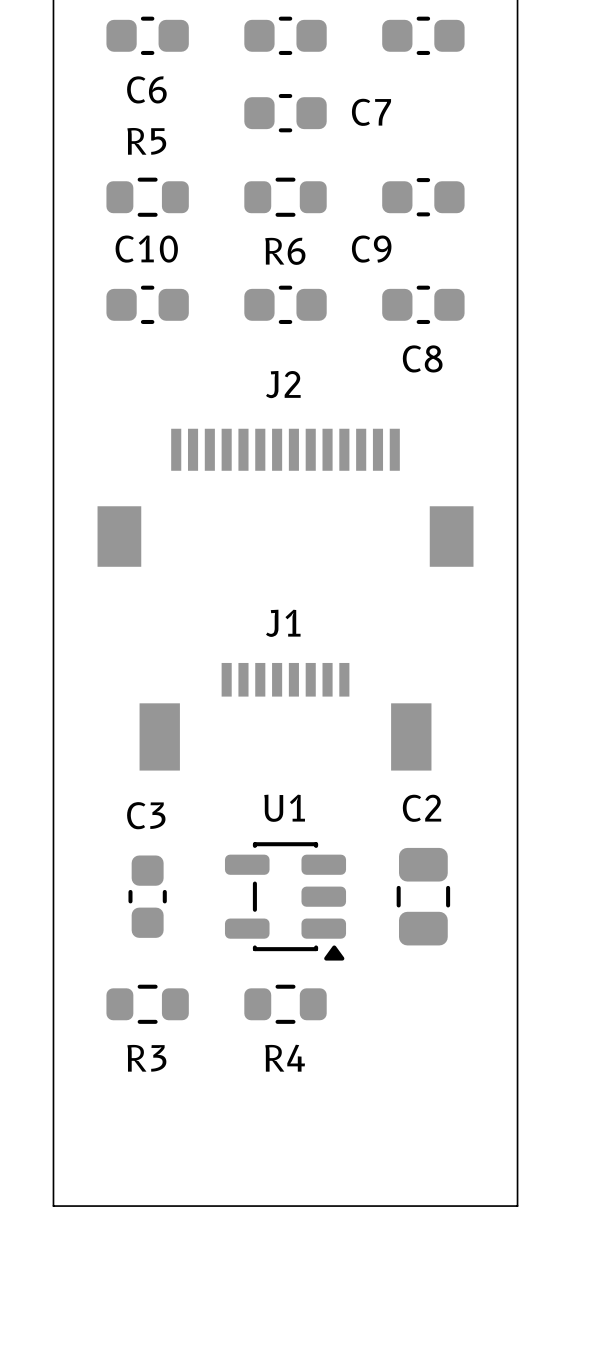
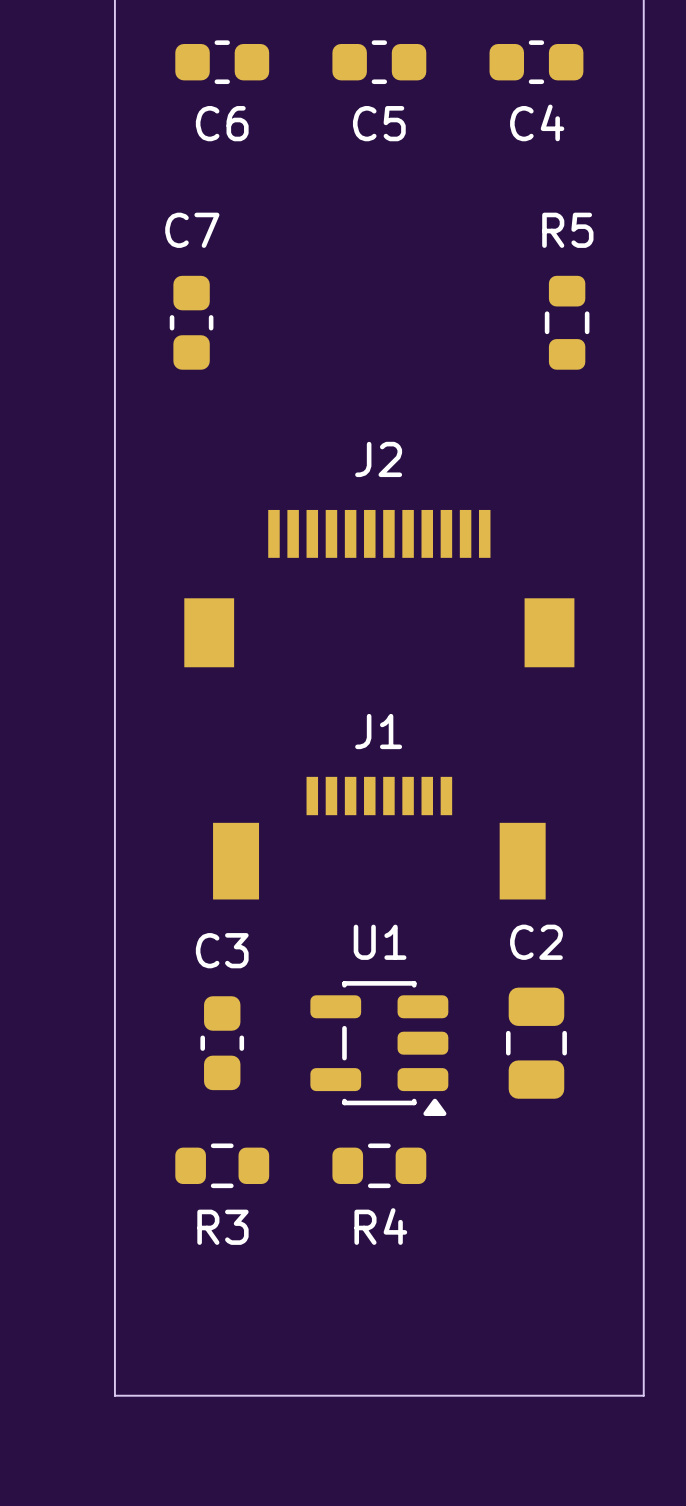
C5 name: none -> C5 (379, 123)
C4 name: none -> C4 (537, 122)
C7 name position: C7 (371, 112) -> C7 (192, 230)
C7 rotation: 0° (285, 113) -> 90° clockwise (191, 322)
C7 position: (285, 113) -> (191, 322)
R5 rotation: 0° (147, 197) -> 90° clockwise (567, 322)
R5 position: (147, 197) -> (567, 322)
R6: (285, 197) -> none
part: (423, 197) -> none
C10: (147, 304) -> none
C9: (285, 304) -> none
C8: (423, 304) -> none
J2 footprint: [97, 428, 474, 567] -> [184, 509, 575, 668]

